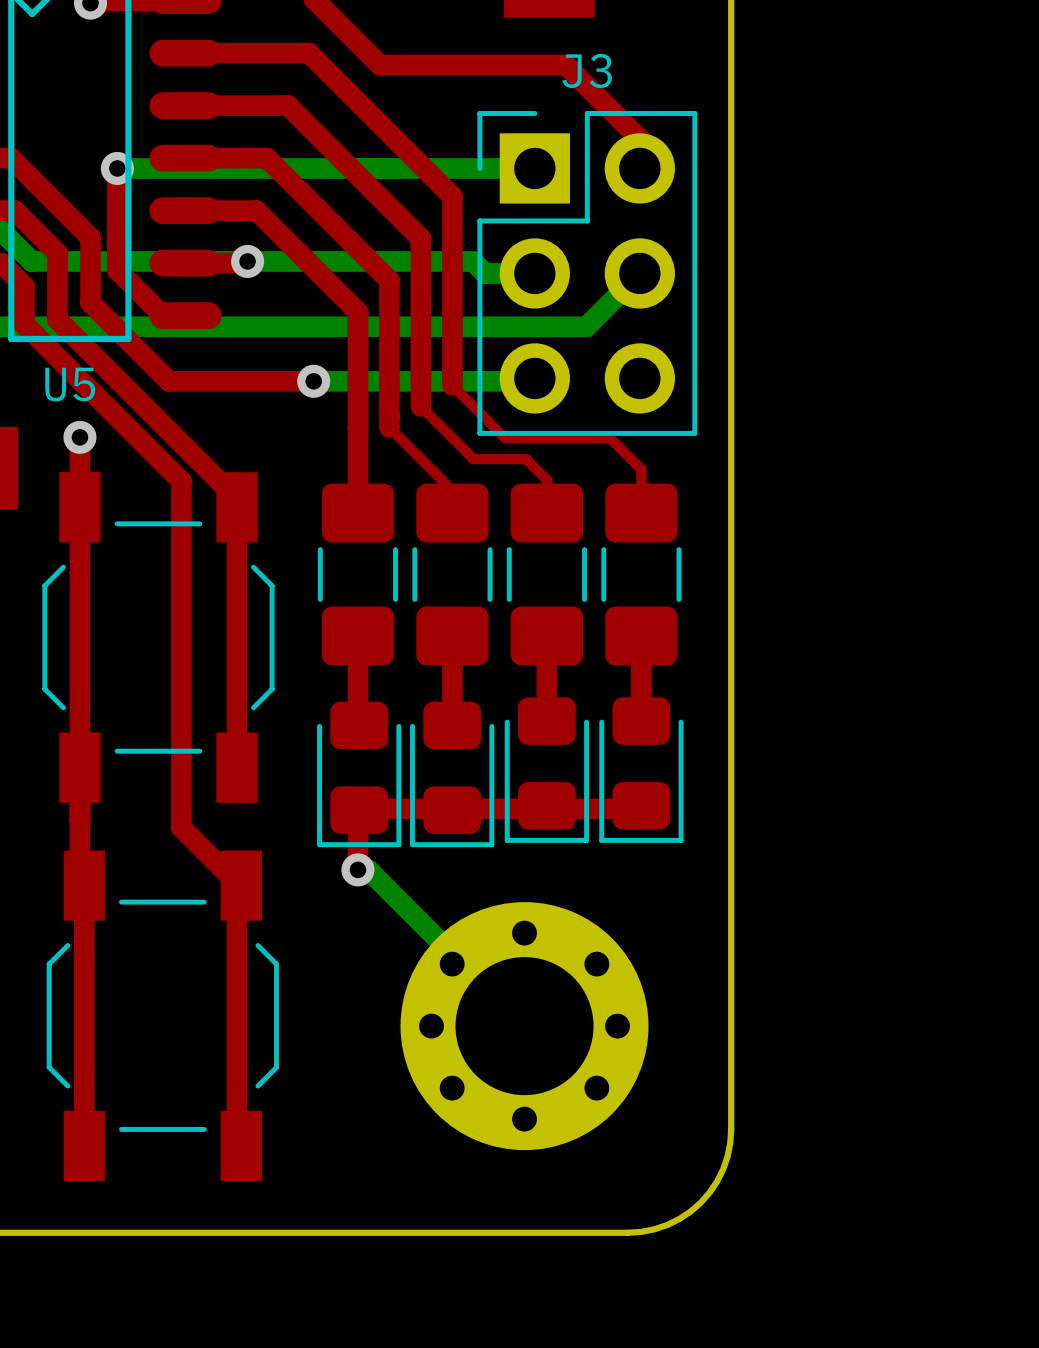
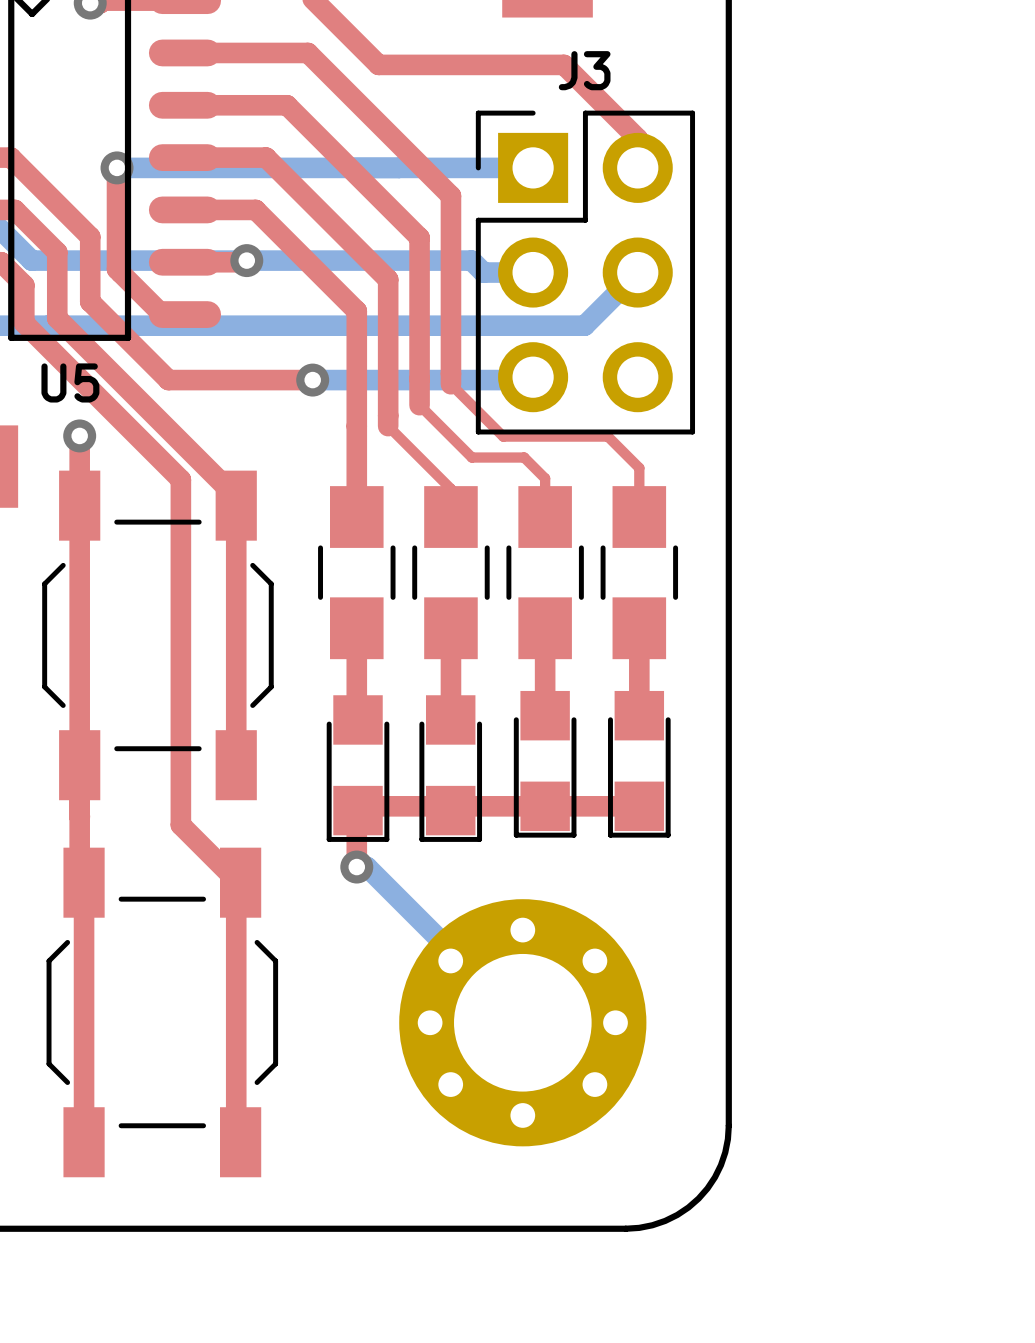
part footprint: [317, 483, 399, 666] -> [318, 486, 396, 660]
part footprint: [412, 483, 493, 666] -> [412, 486, 490, 660]
part footprint: [506, 483, 588, 666] -> [506, 486, 584, 660]
part footprint: [601, 483, 682, 666] -> [600, 486, 679, 660]
part footprint: [504, 697, 590, 843] -> [513, 690, 577, 838]
part footprint: [599, 697, 684, 843] -> [608, 690, 671, 838]
part footprint: [317, 701, 402, 848] -> [326, 695, 390, 842]
part footprint: [410, 701, 495, 848] -> [419, 695, 483, 842]

